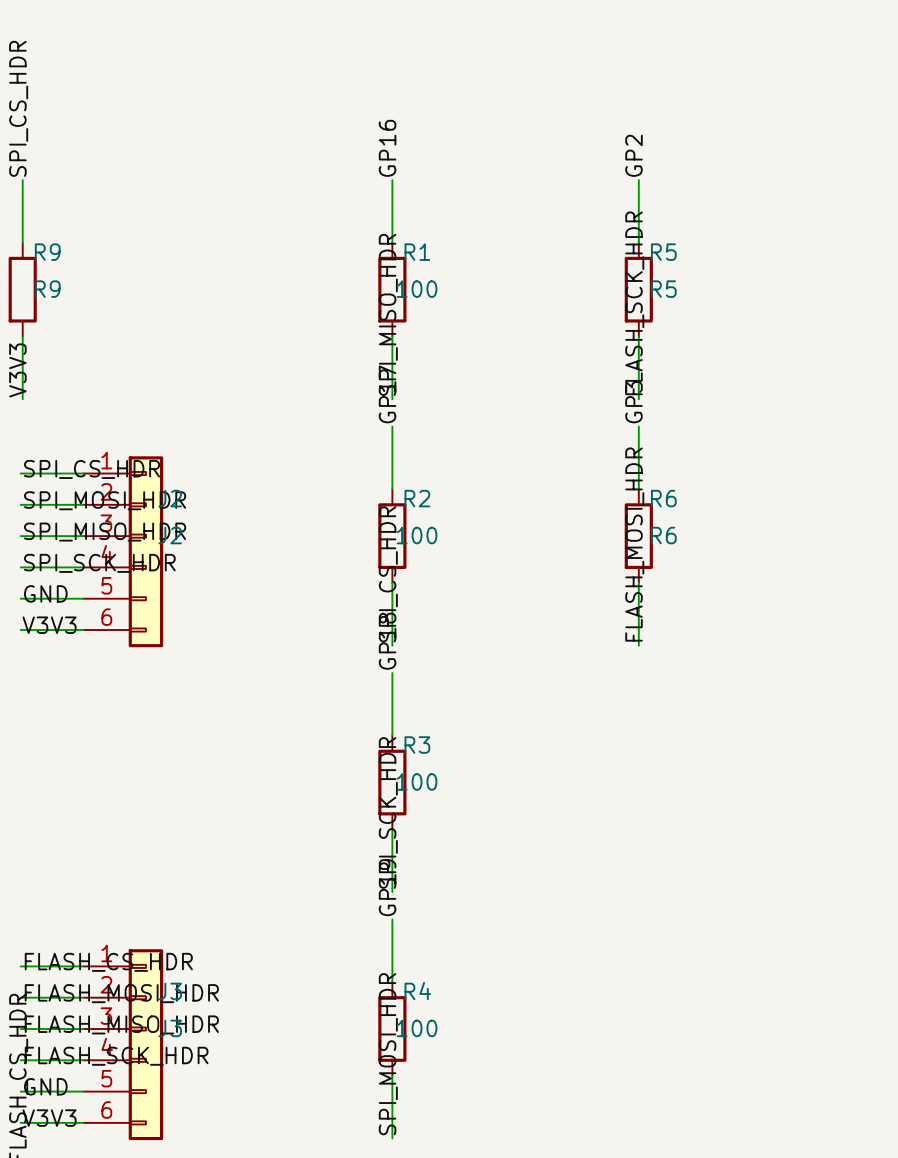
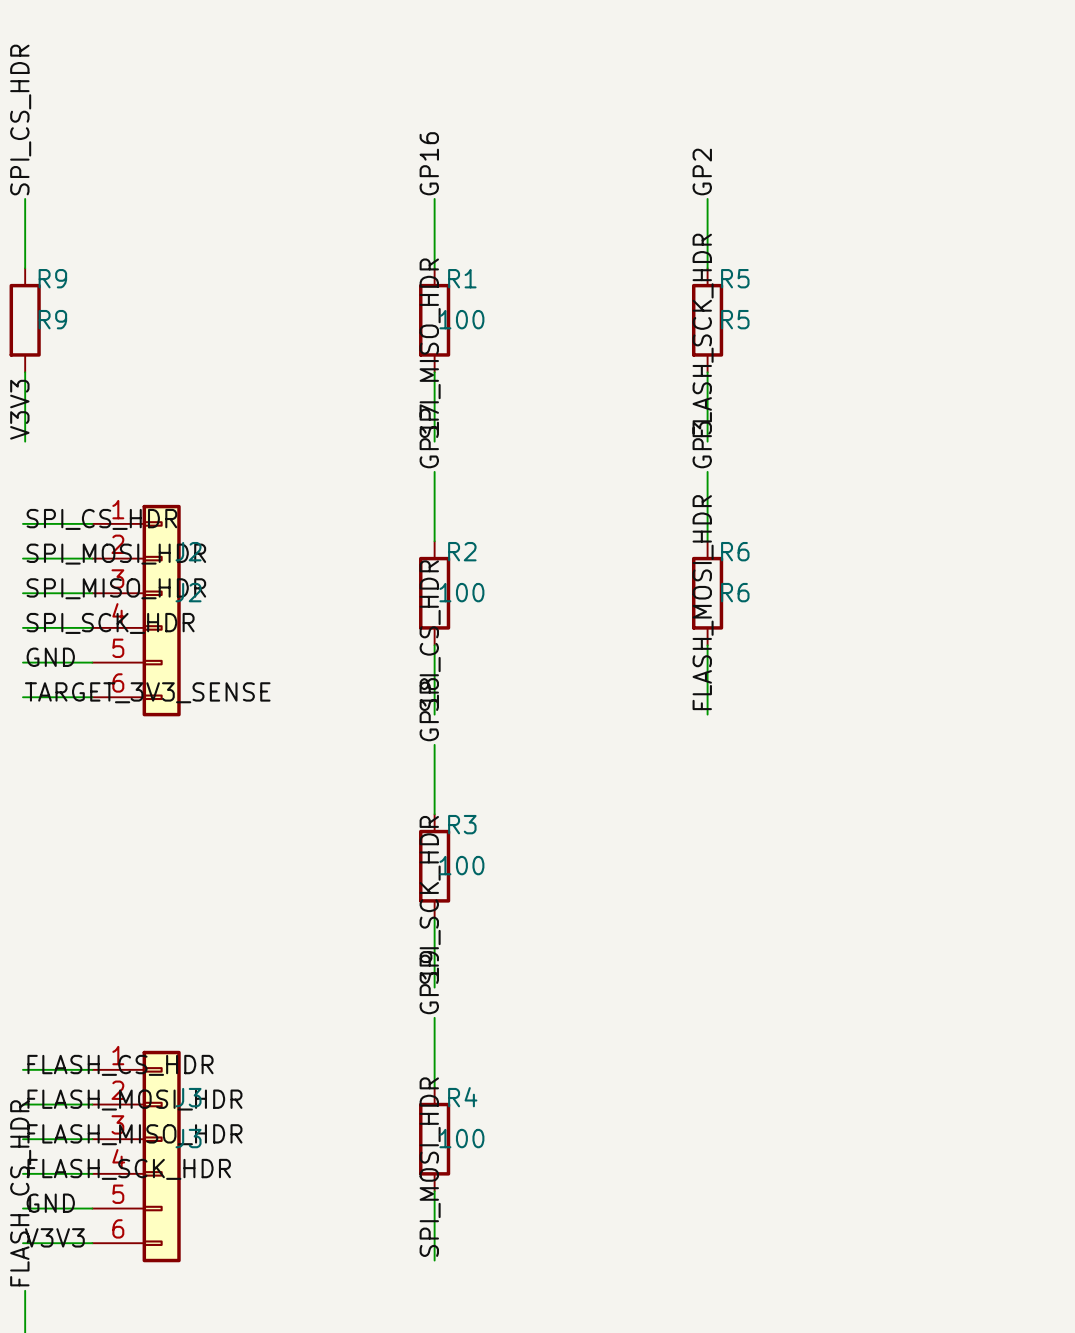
label: V3V3 (49, 625) -> TARGET_3V3_SENSE (147, 692)

